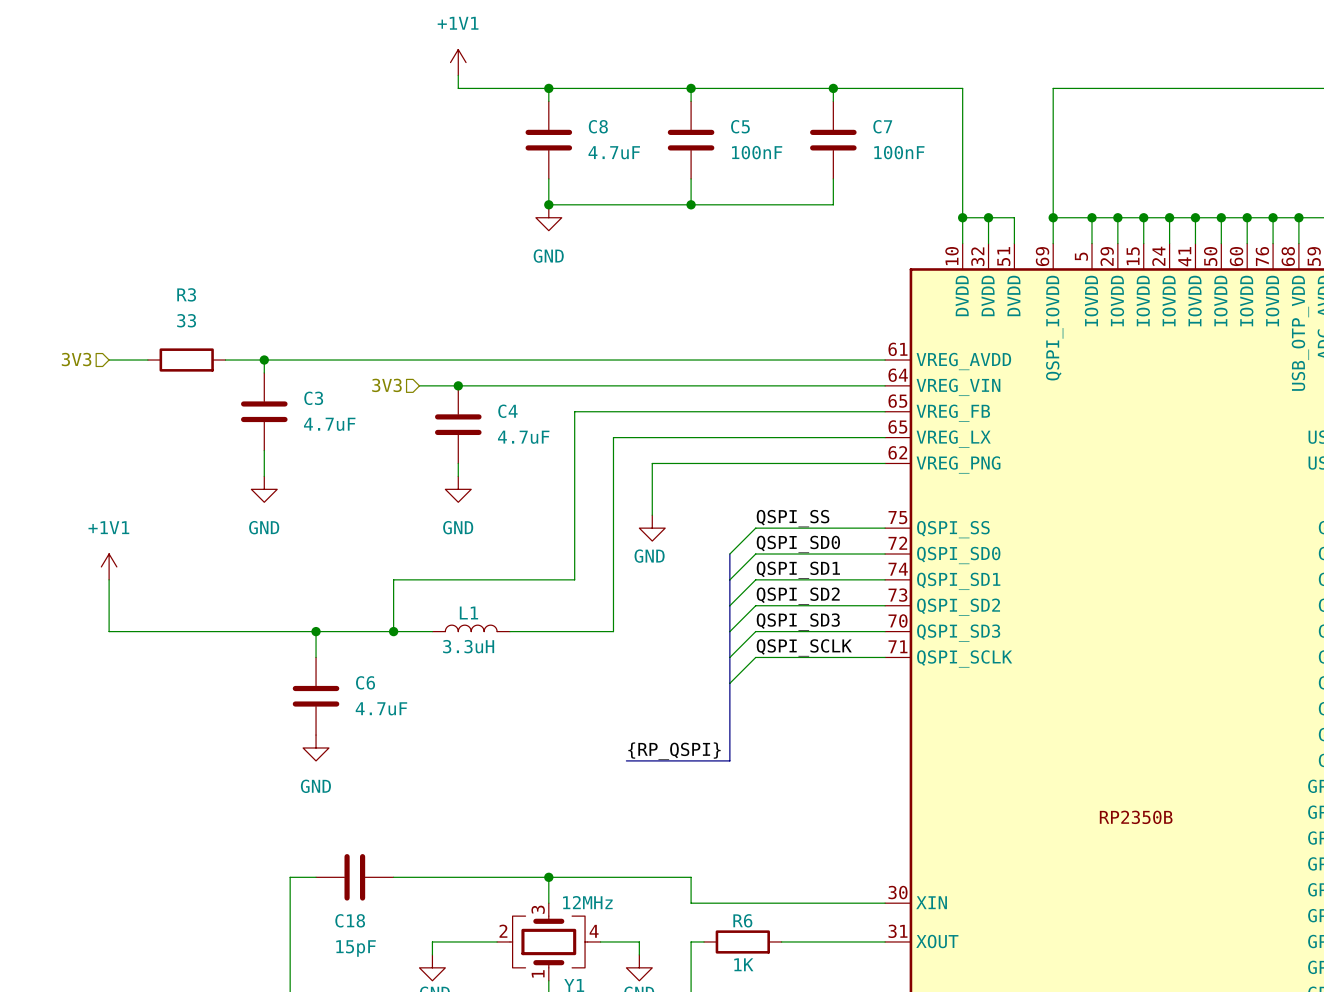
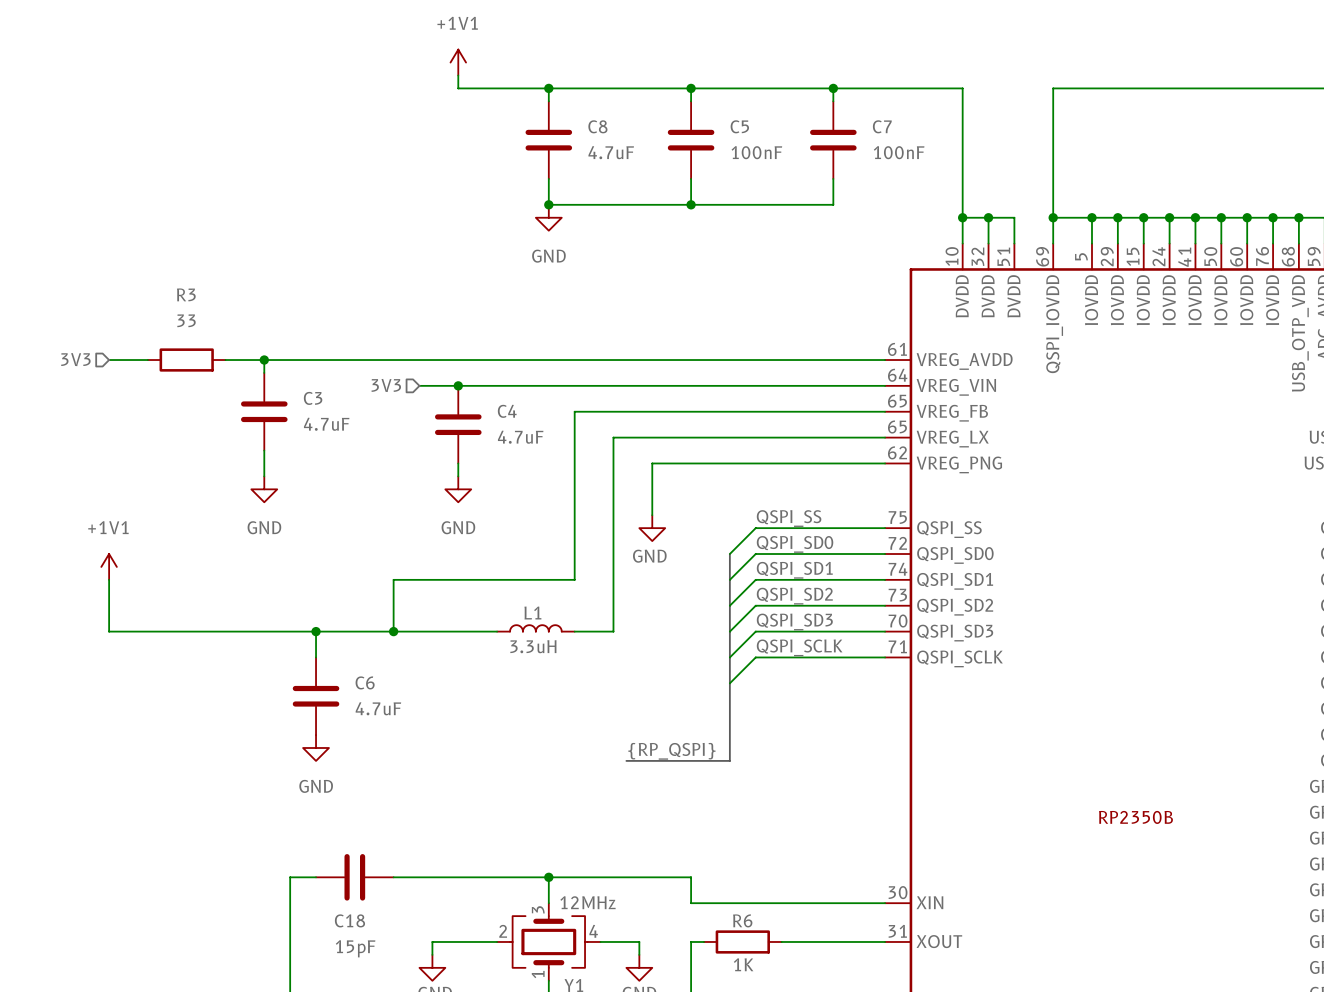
L1 position: (471, 628) -> (535, 628)
wire: (510, 631) (574, 631) -> (432, 631) (497, 631)

